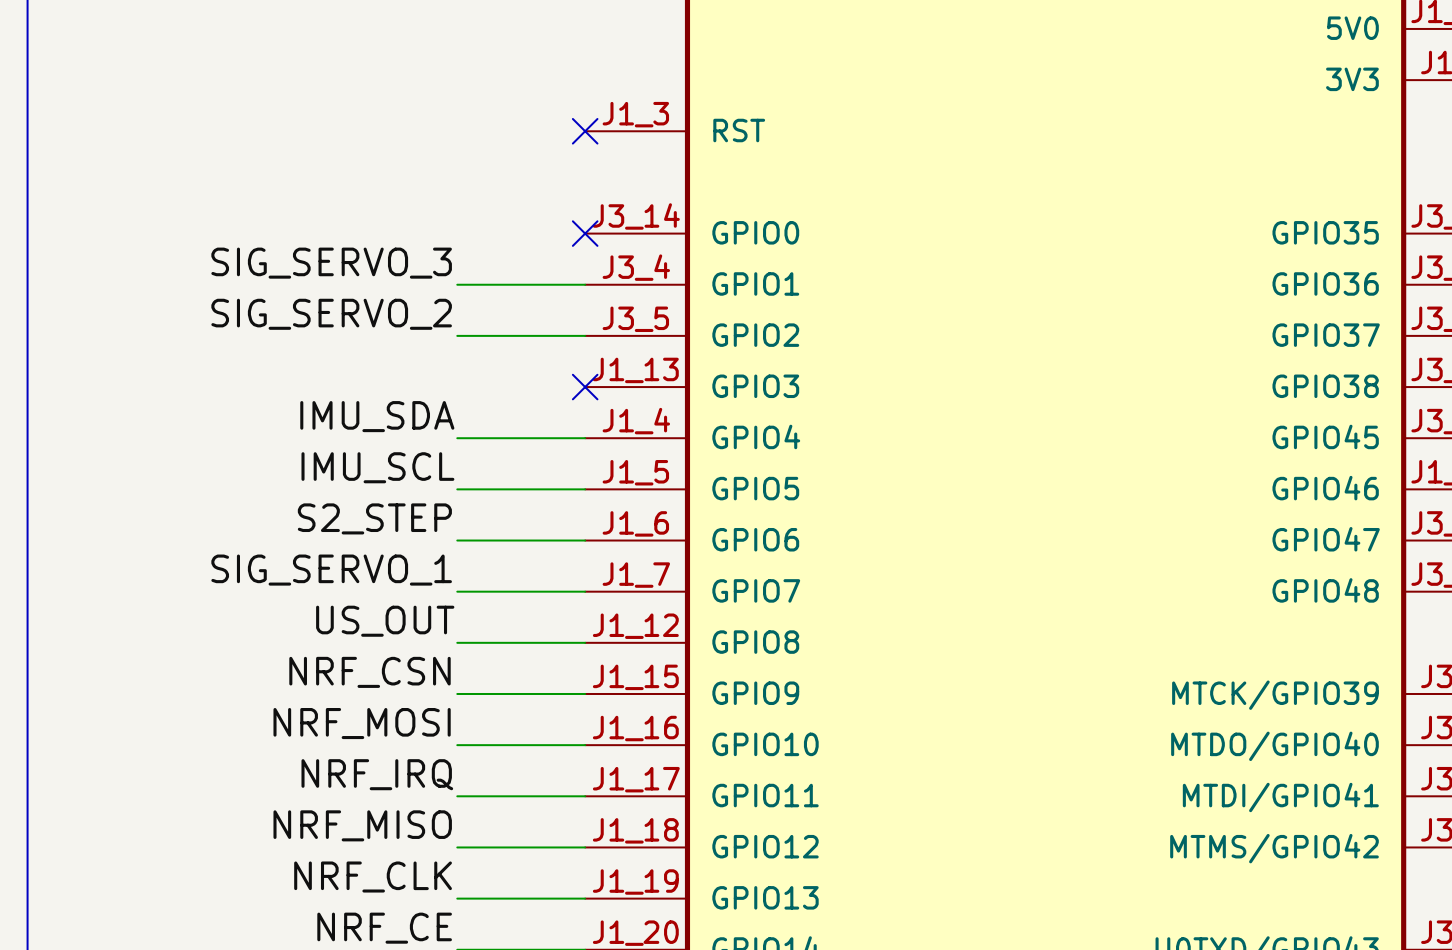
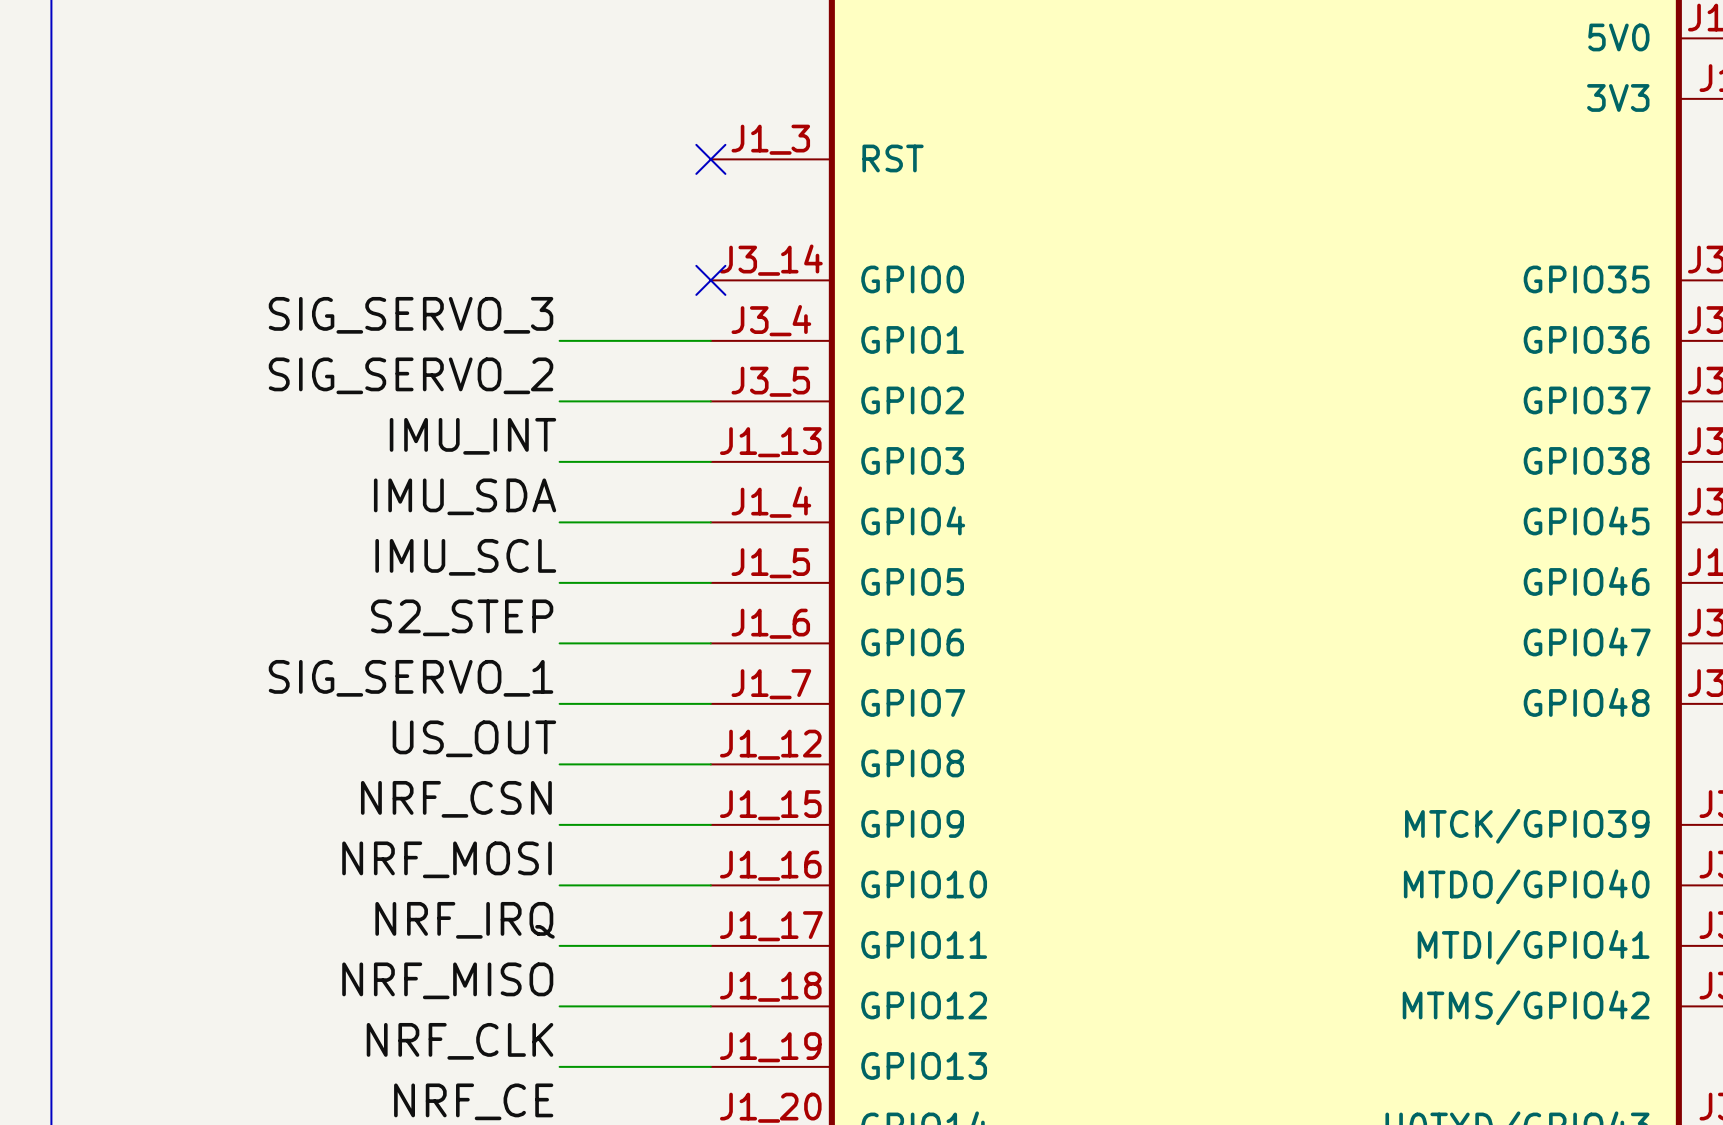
label: none -> IMU_INT (472, 436)
wire: none -> (559, 461) (710, 461)
no-connect mark: (585, 387) -> none

